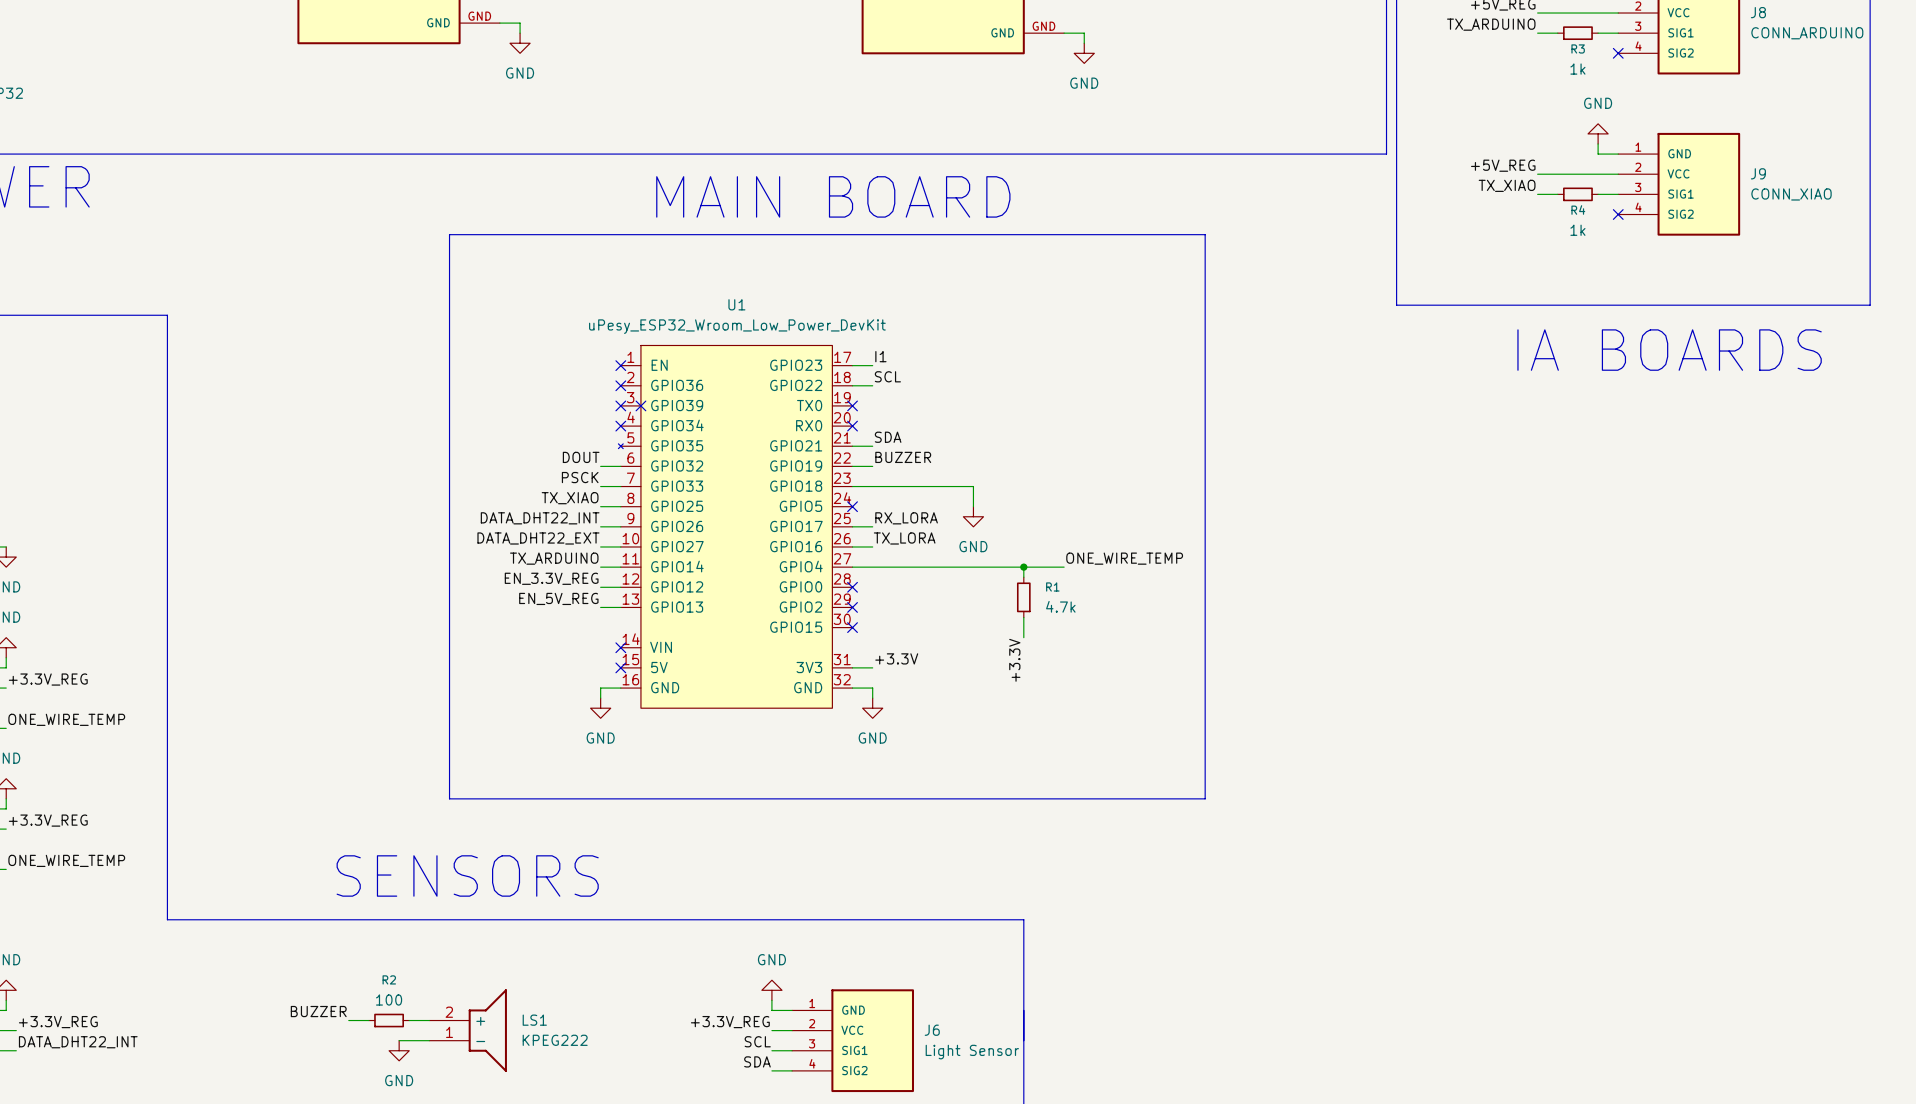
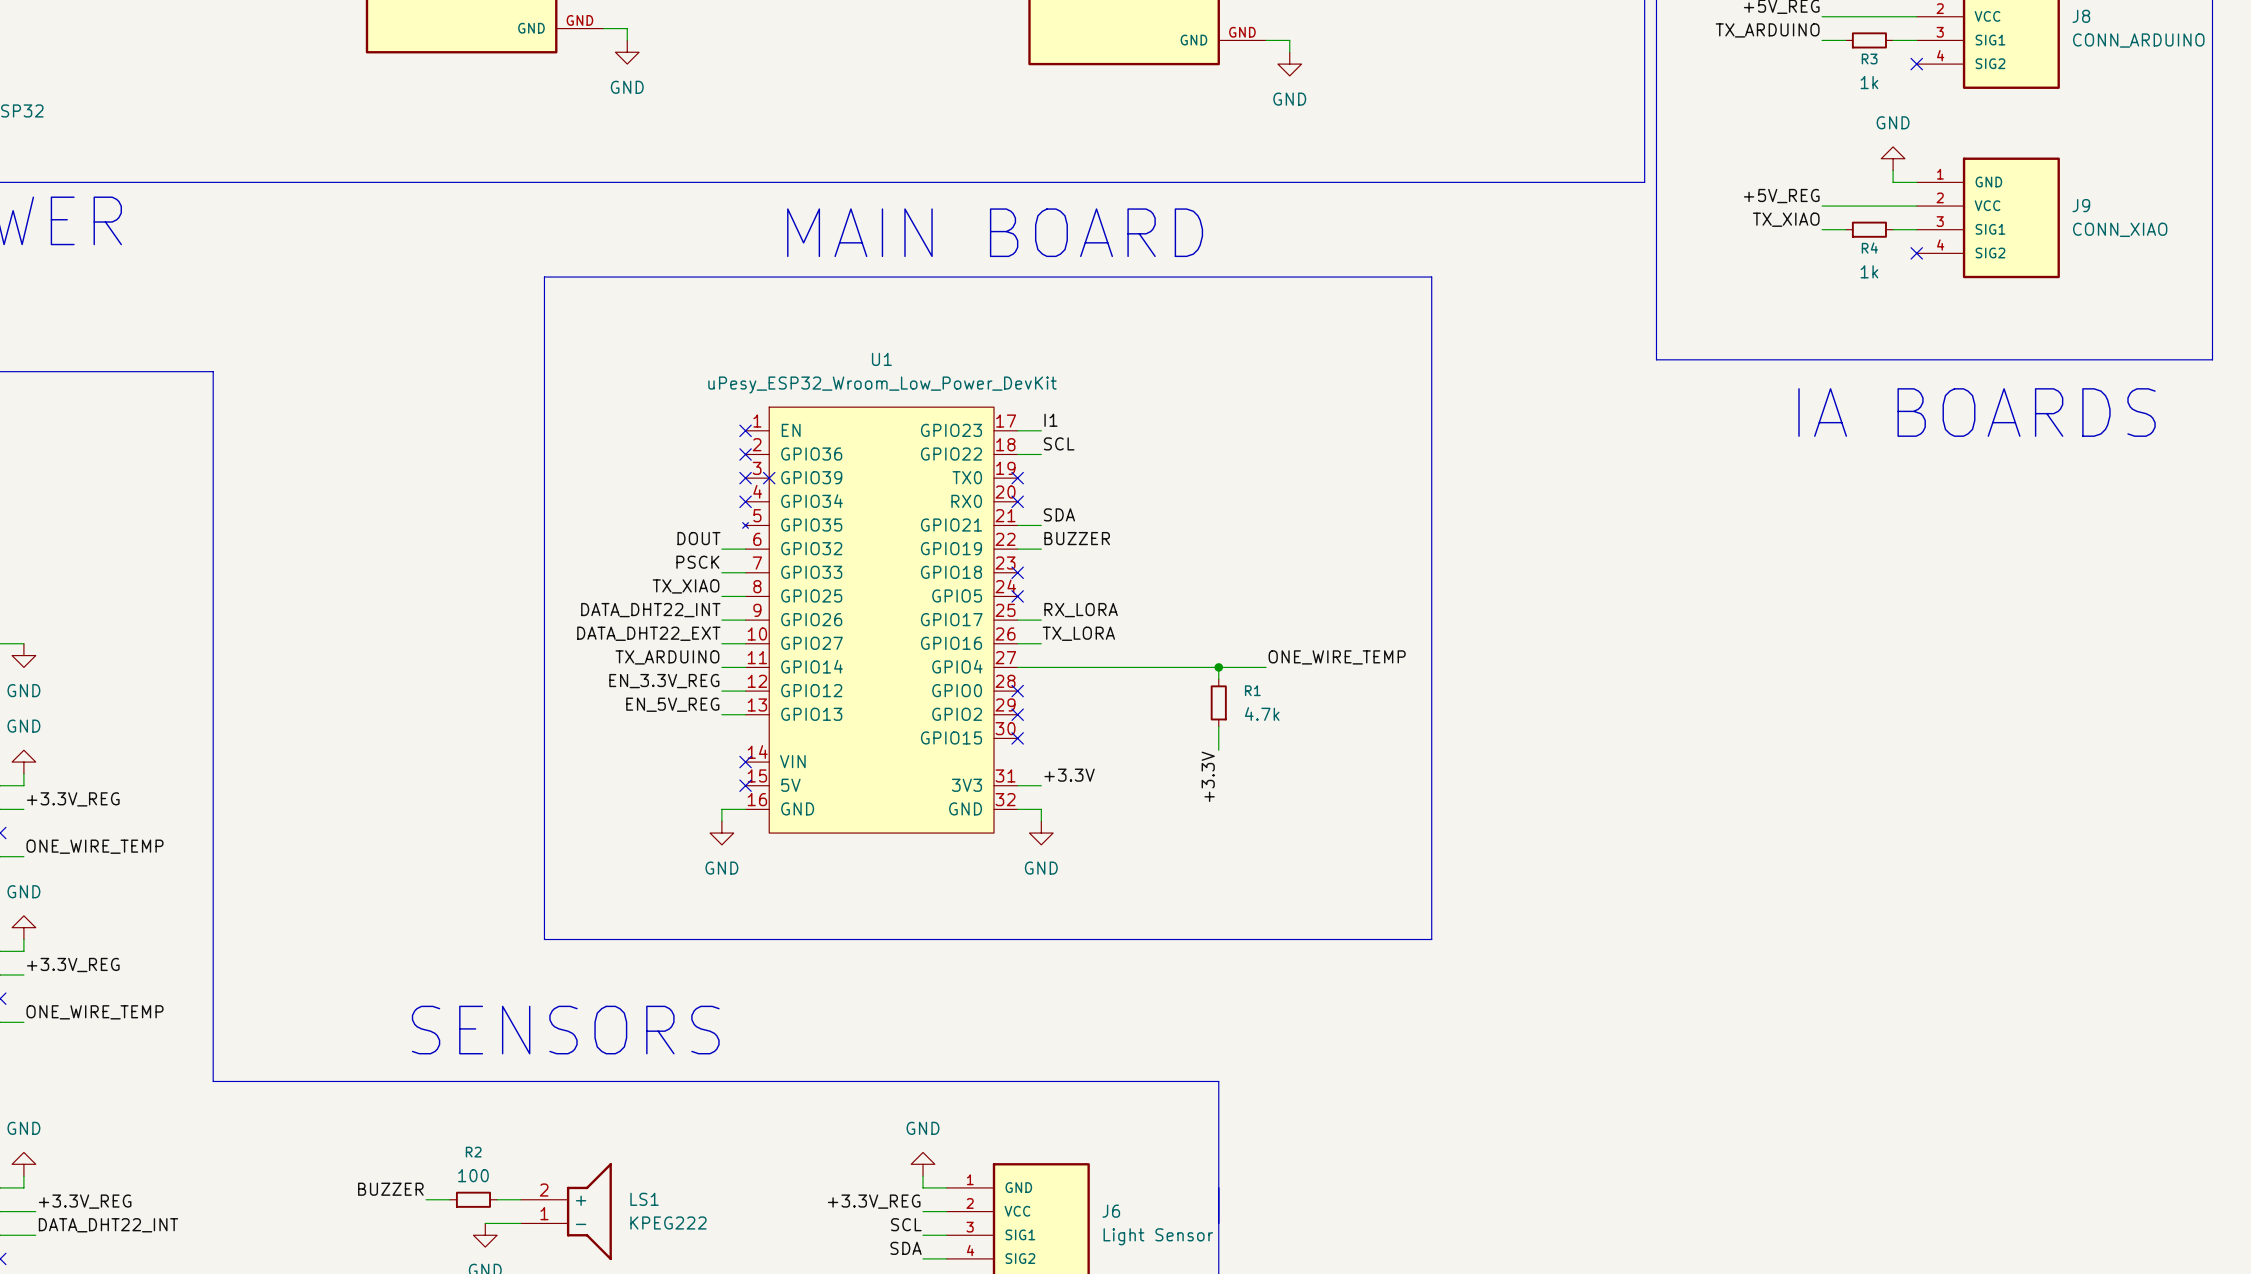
wire: (852, 486) (973, 486) (973, 506) -> none
no-connect mark: none -> (1017, 572)
power symbol: GND (973, 516) -> none

